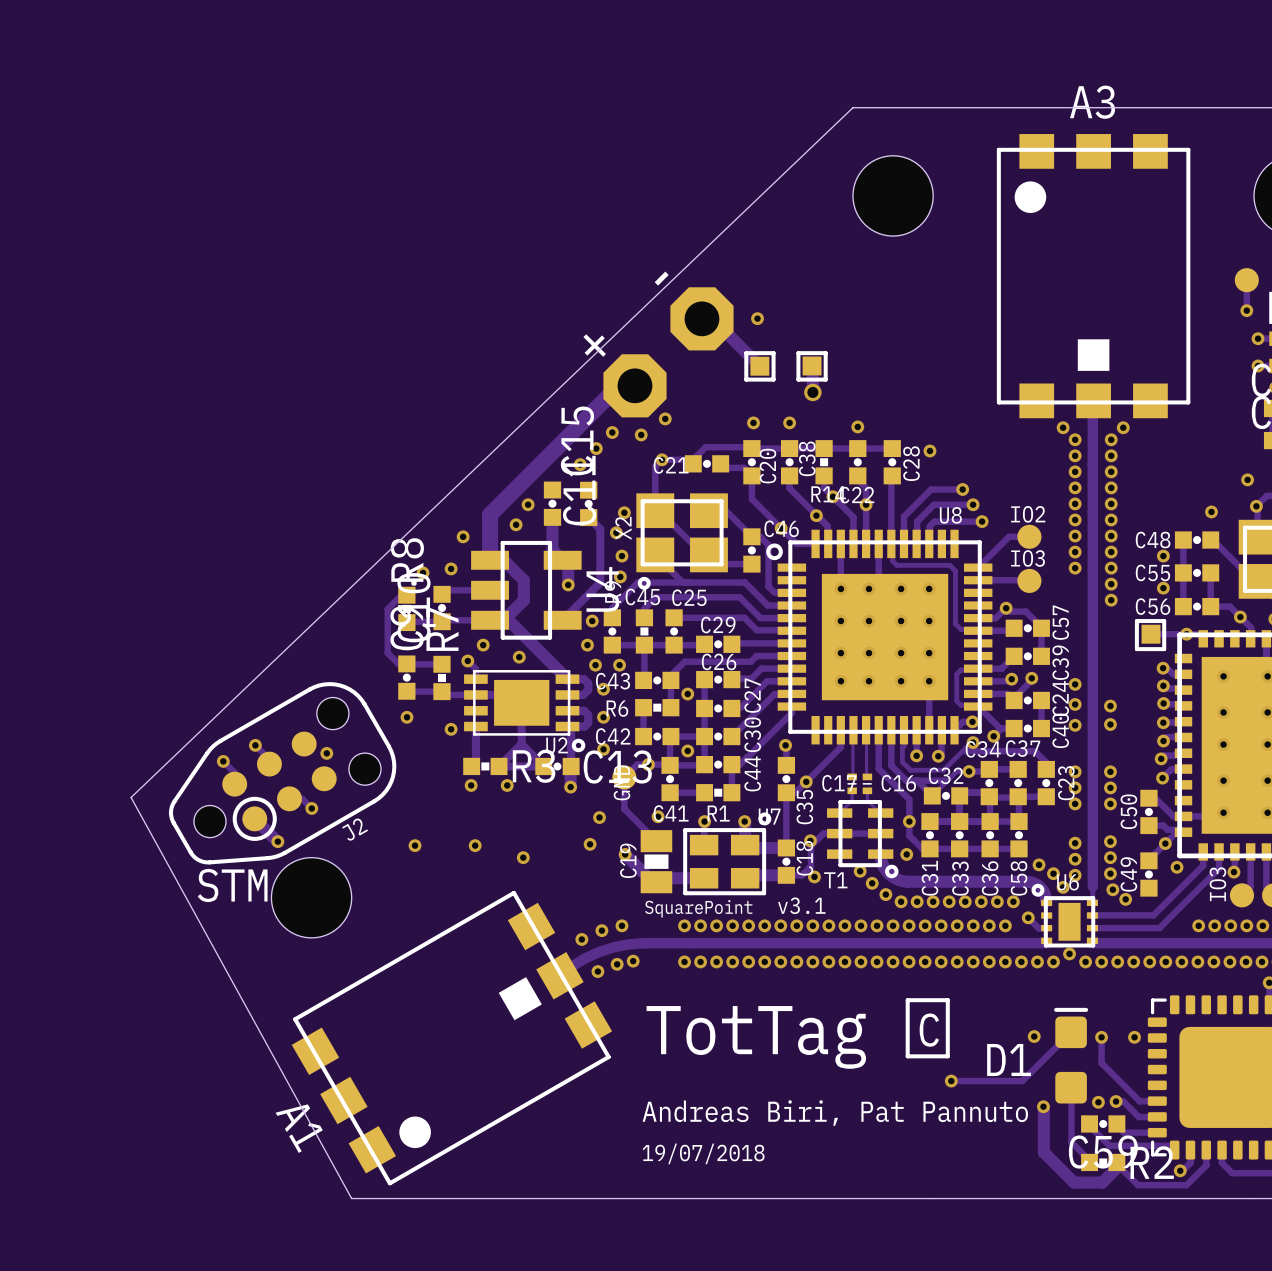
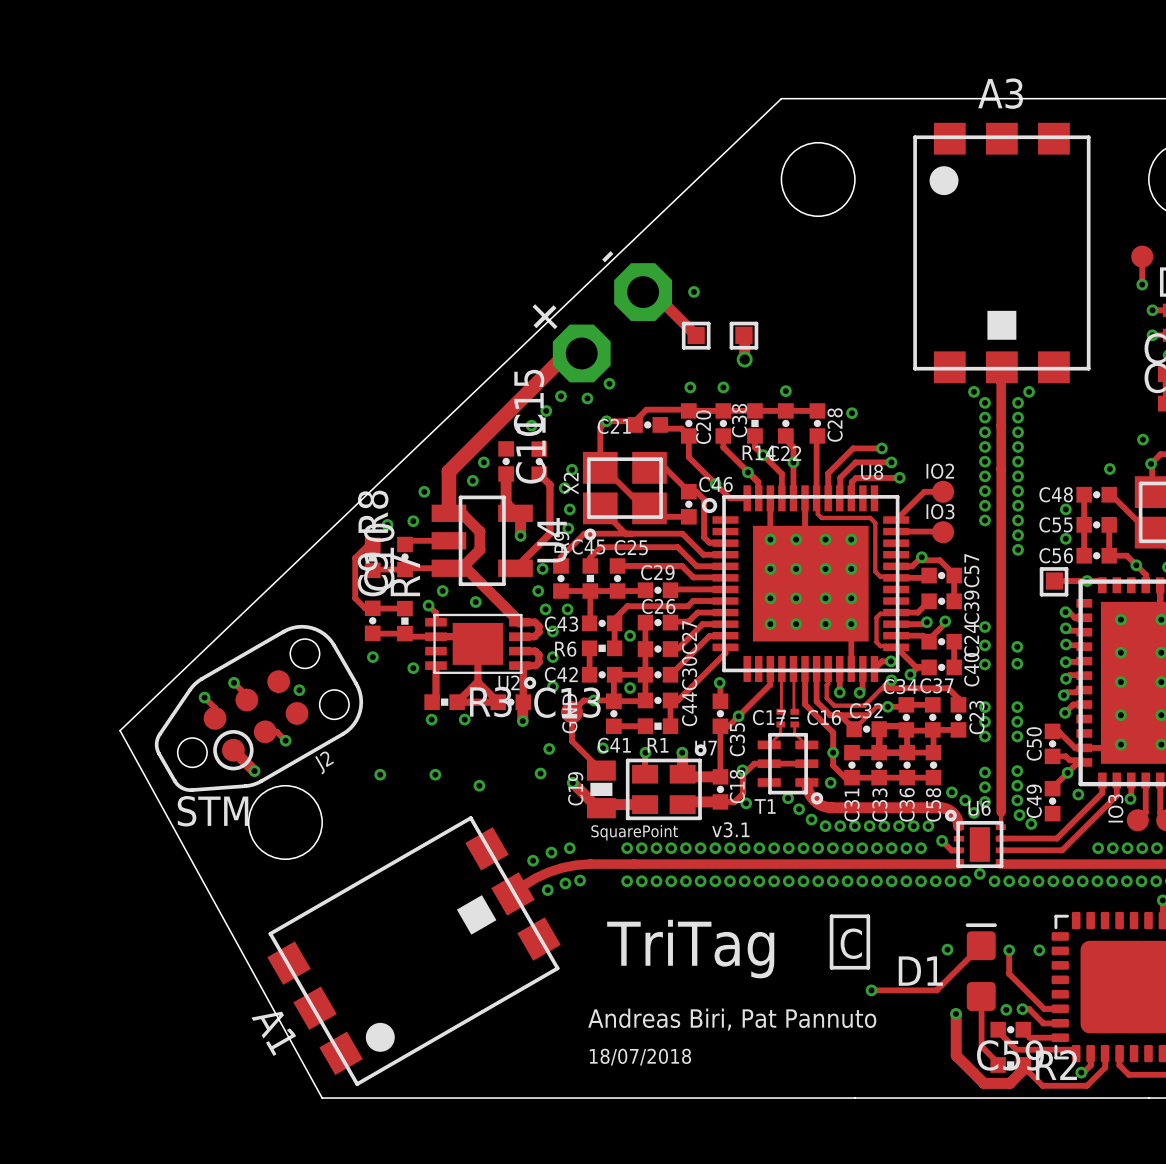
text: TotTag (756, 1037) -> TriTag (690, 949)
text: 19/07/2018 (703, 1153) -> 18/07/2018 (640, 1057)

